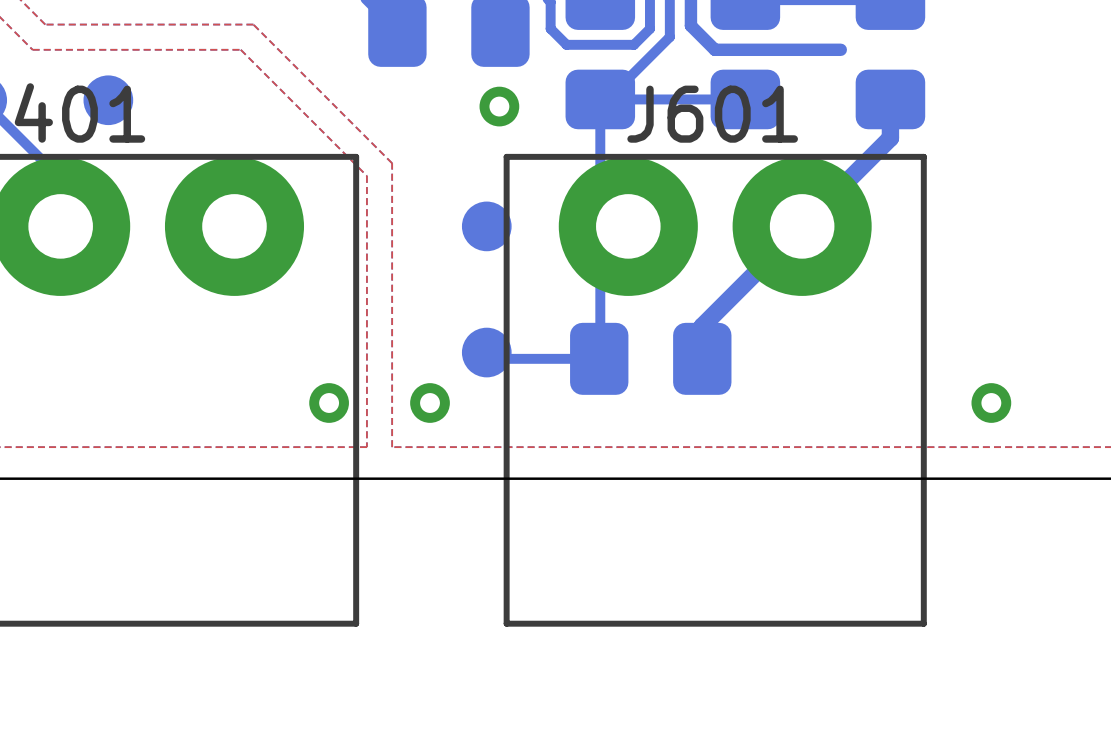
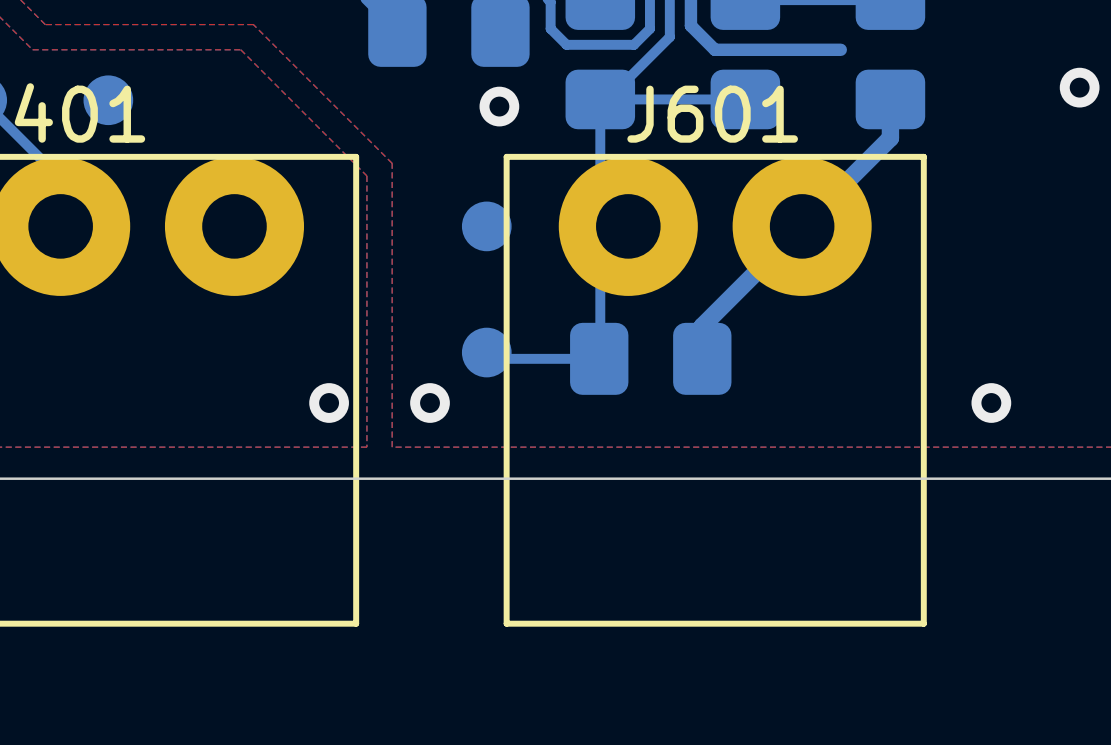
via: none -> (1079, 87)

